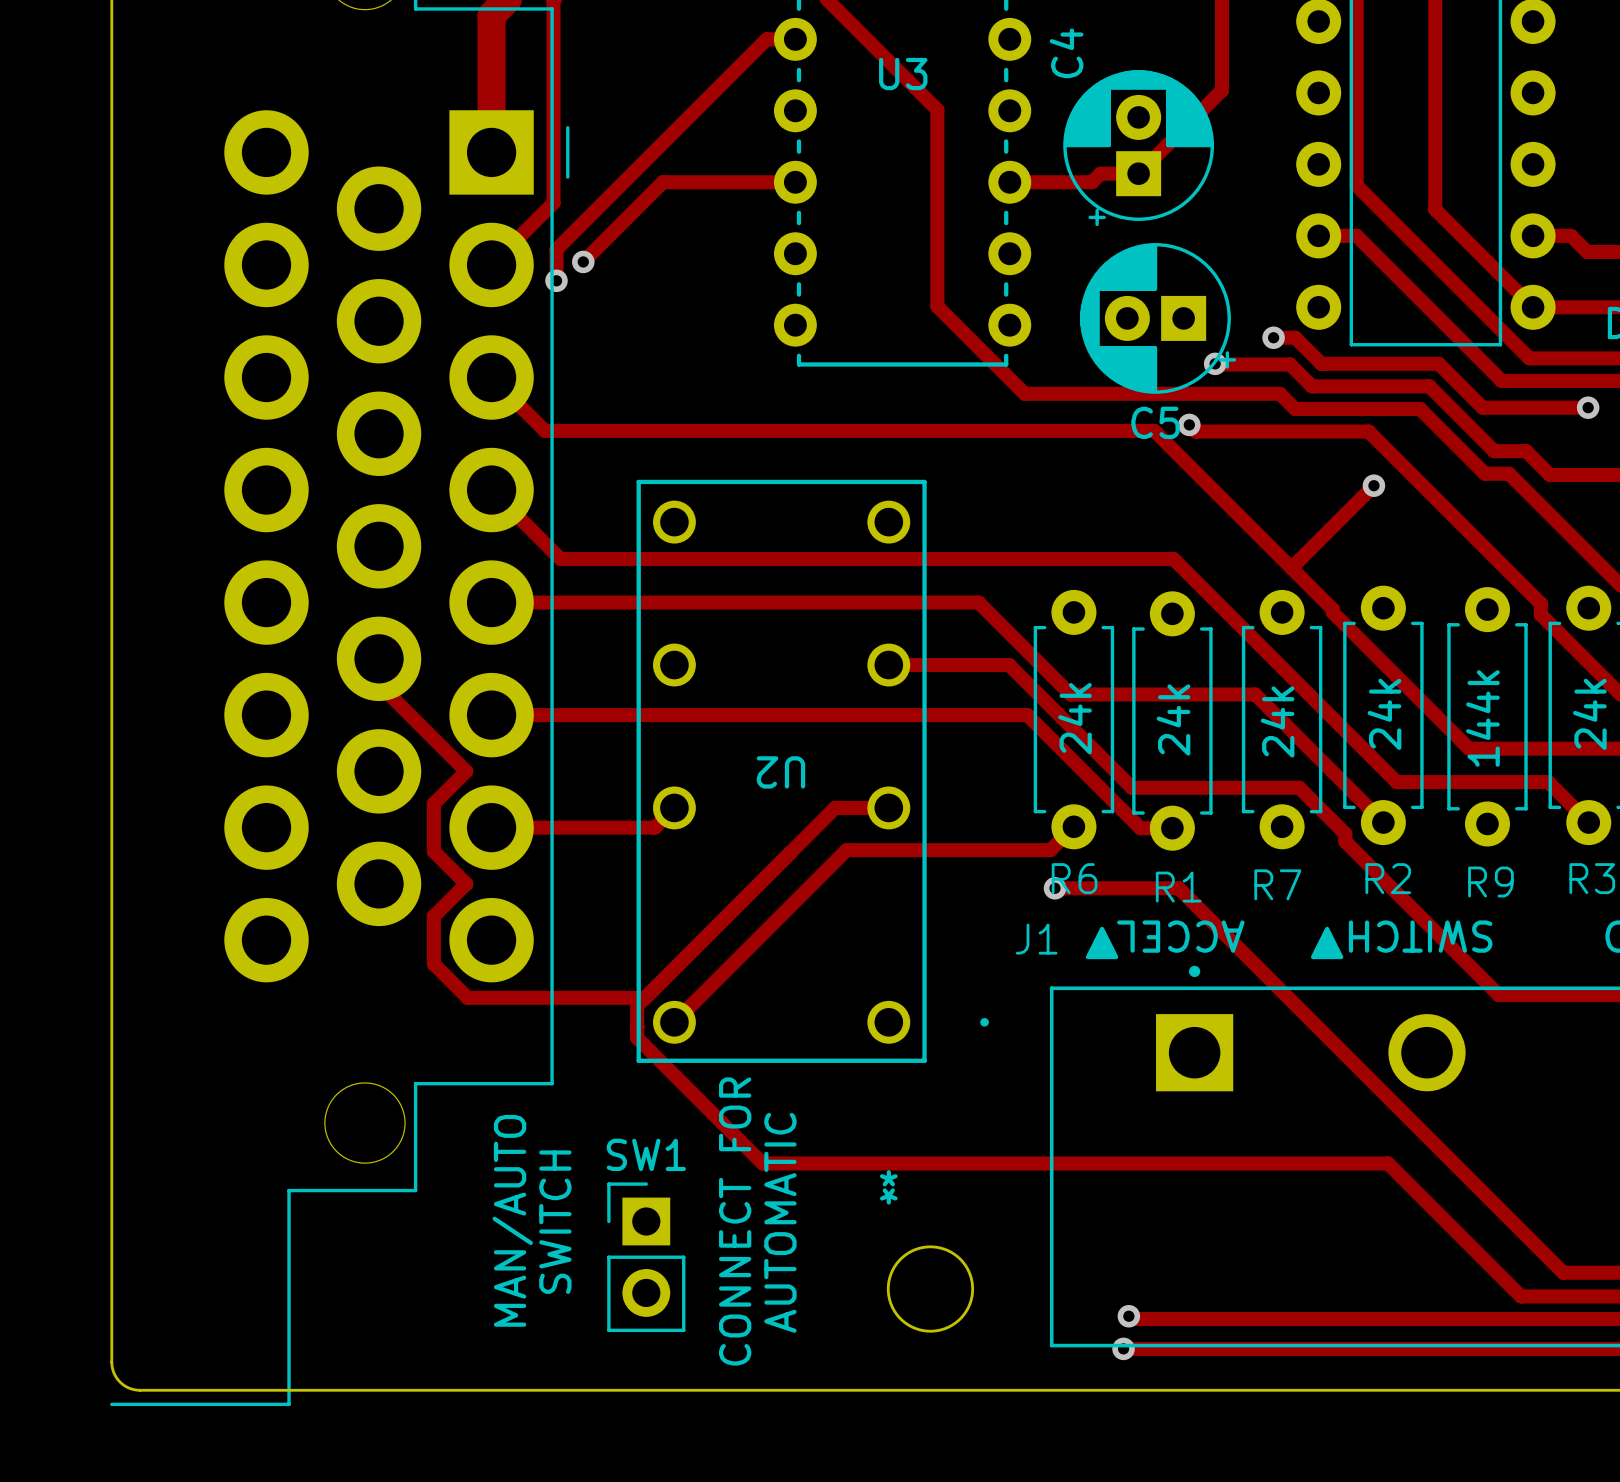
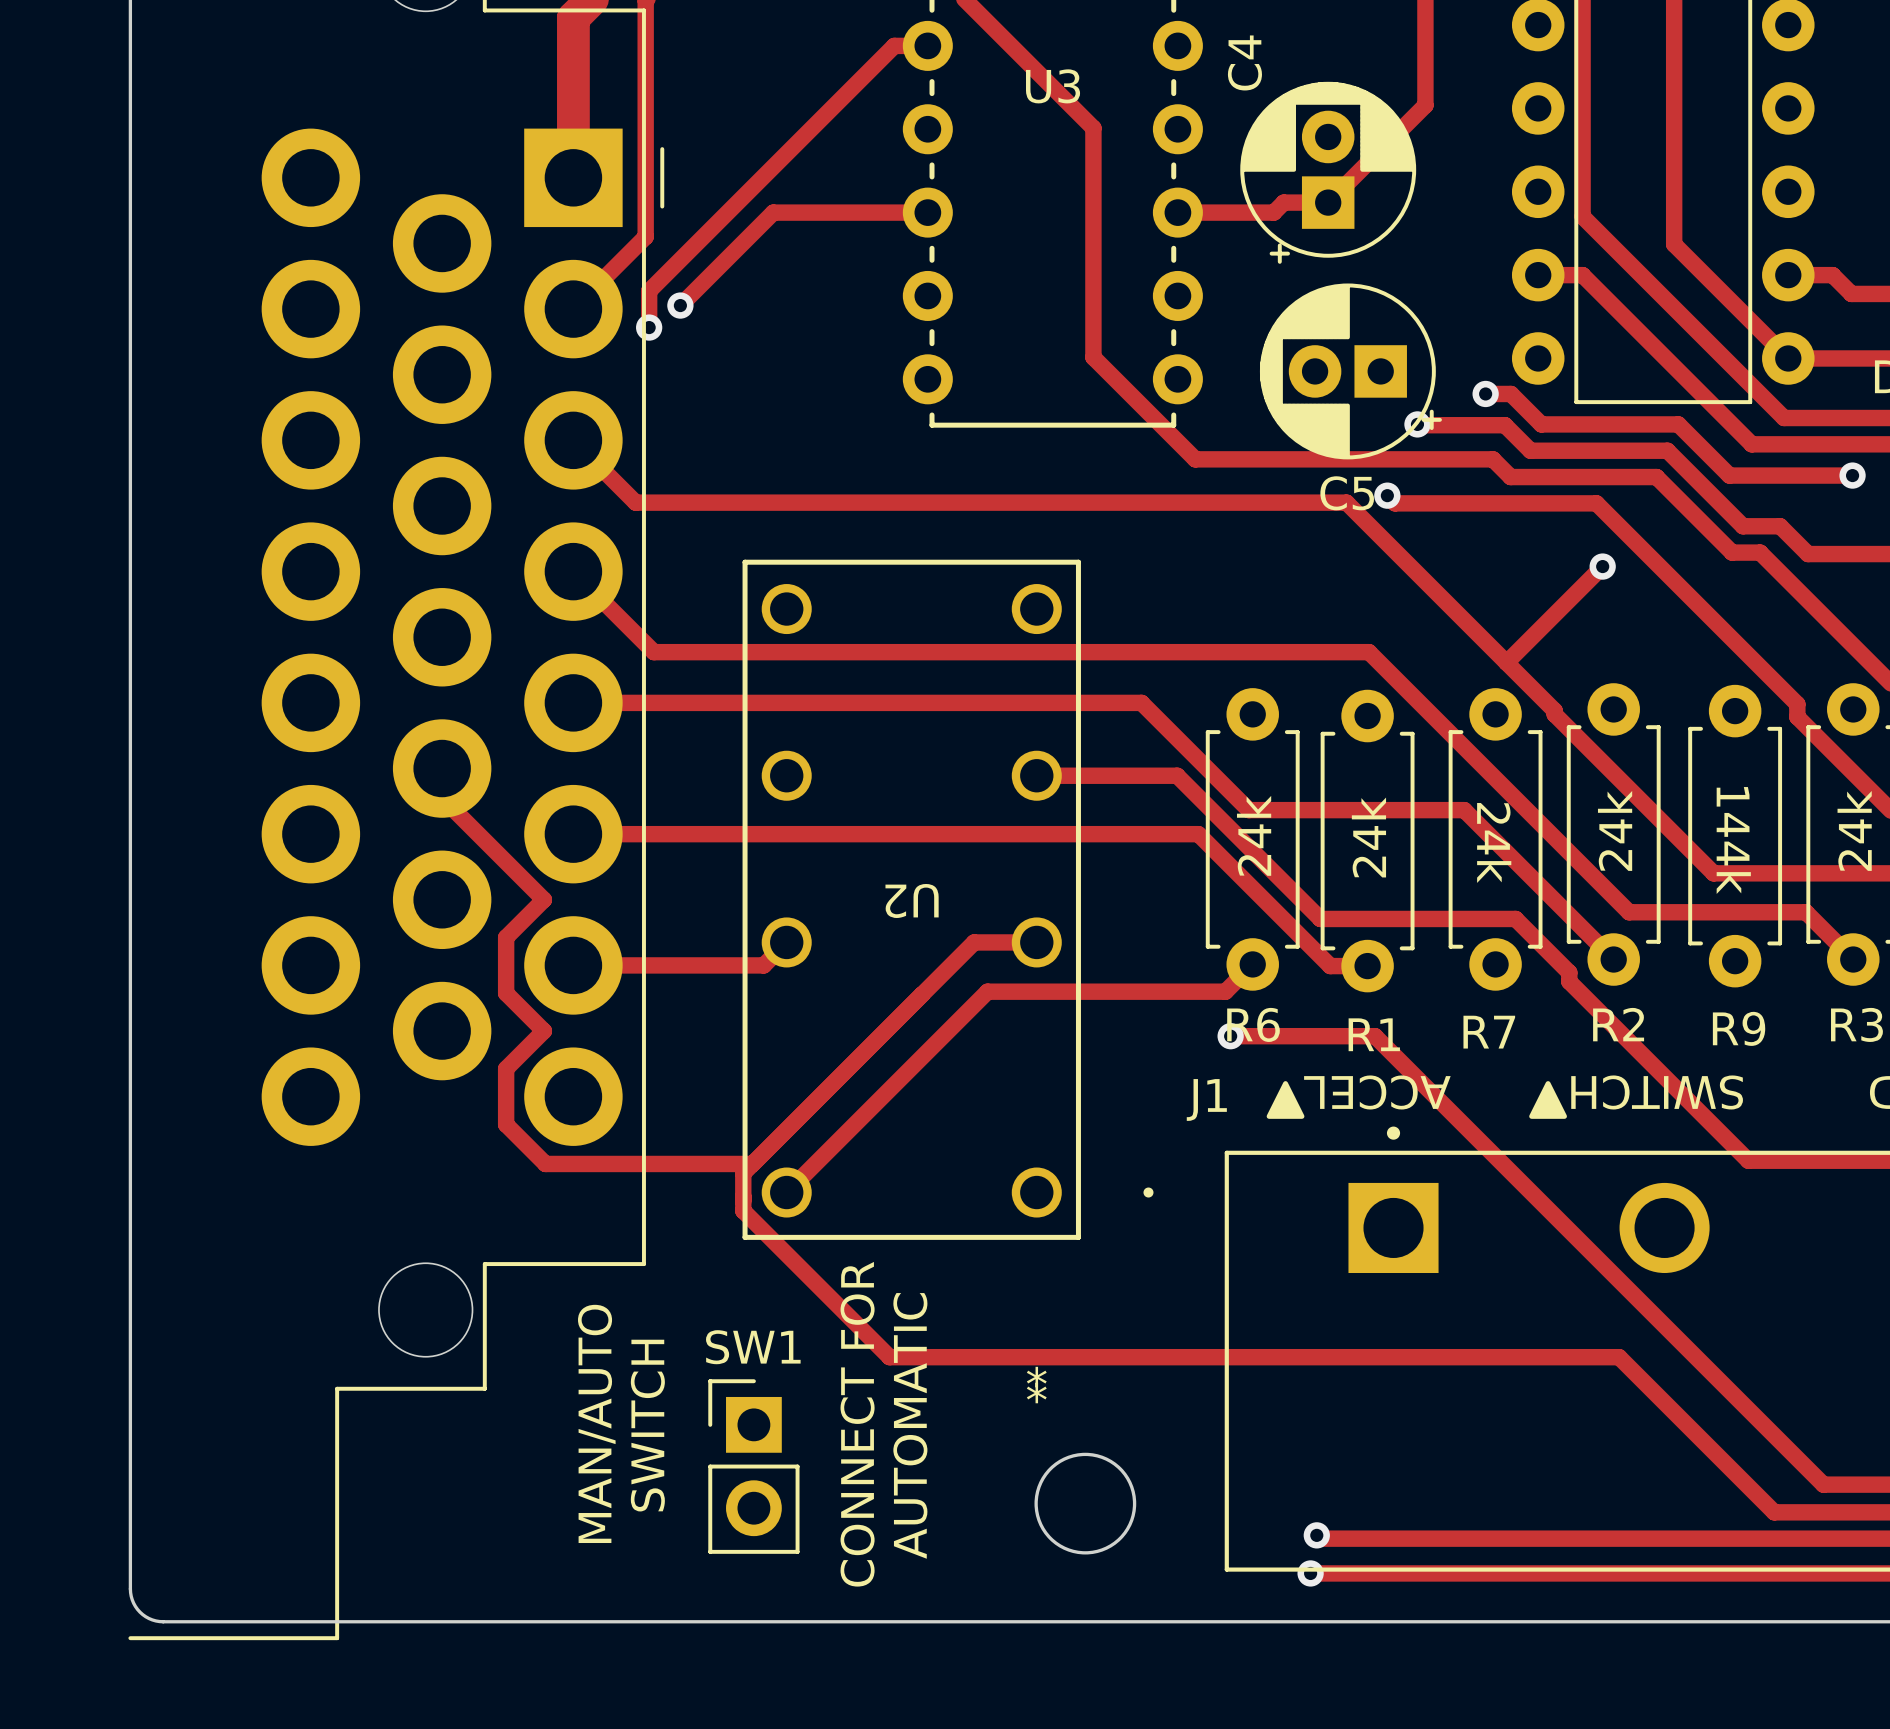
R9 value rotation: 0° (1482, 718) -> 180° (1733, 840)
R7 value rotation: 0° (1277, 721) -> 180° (1494, 842)

